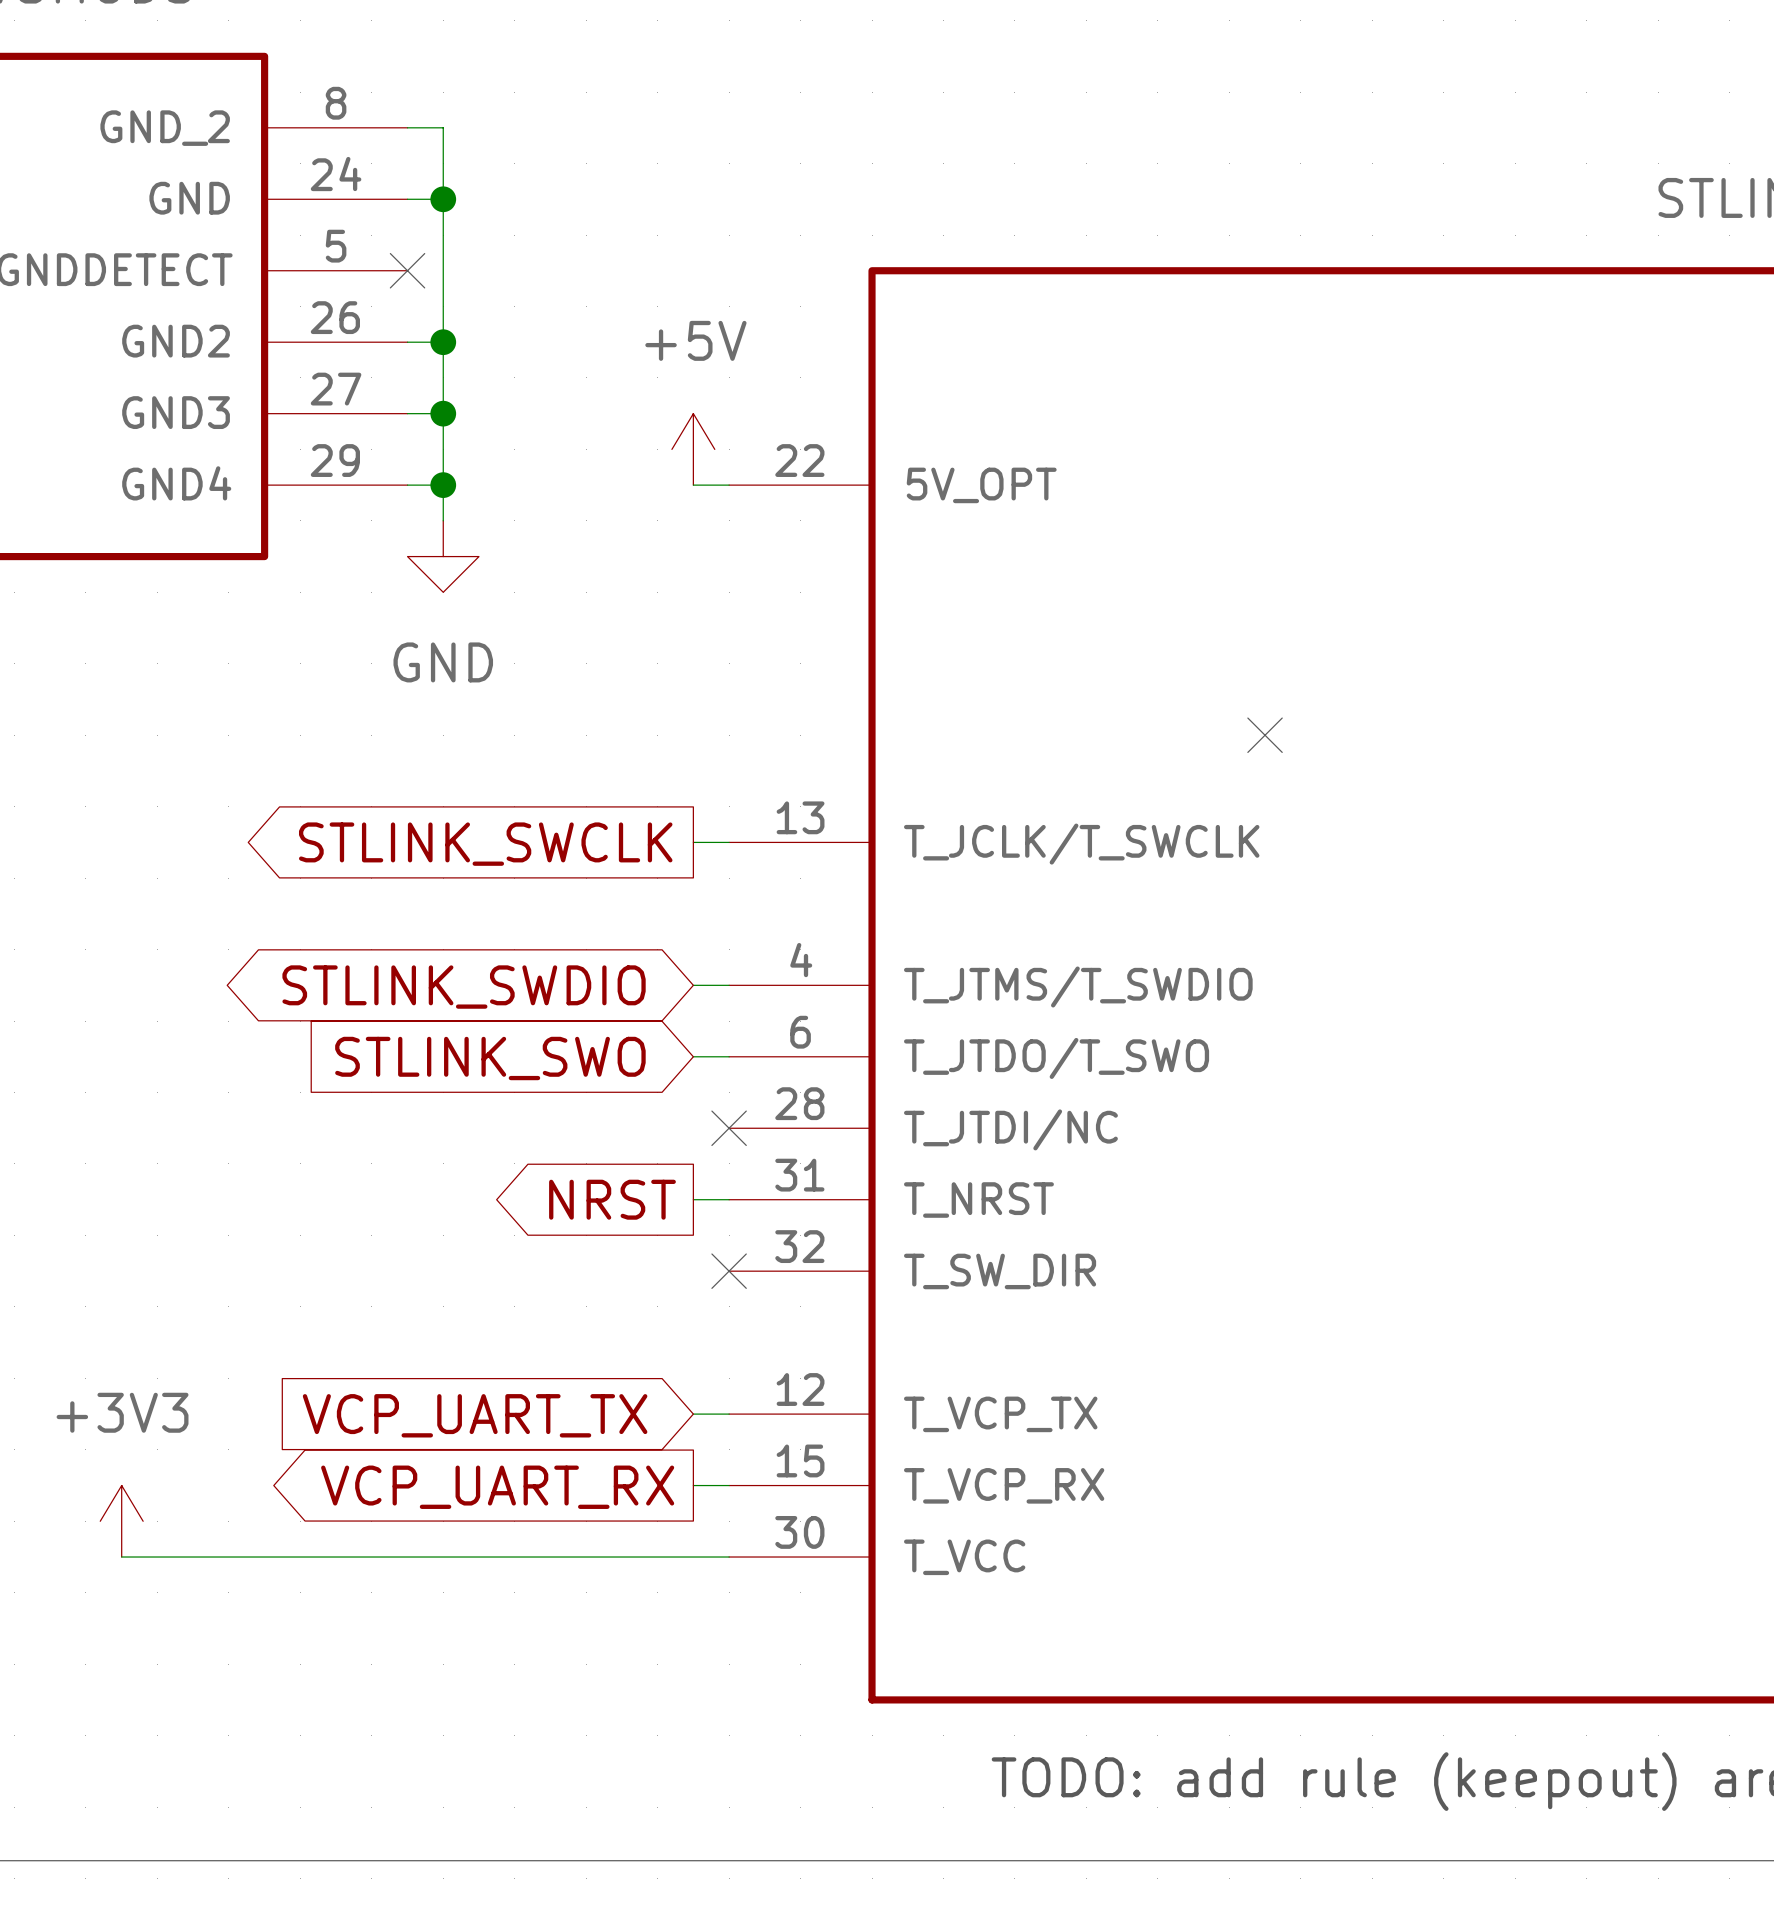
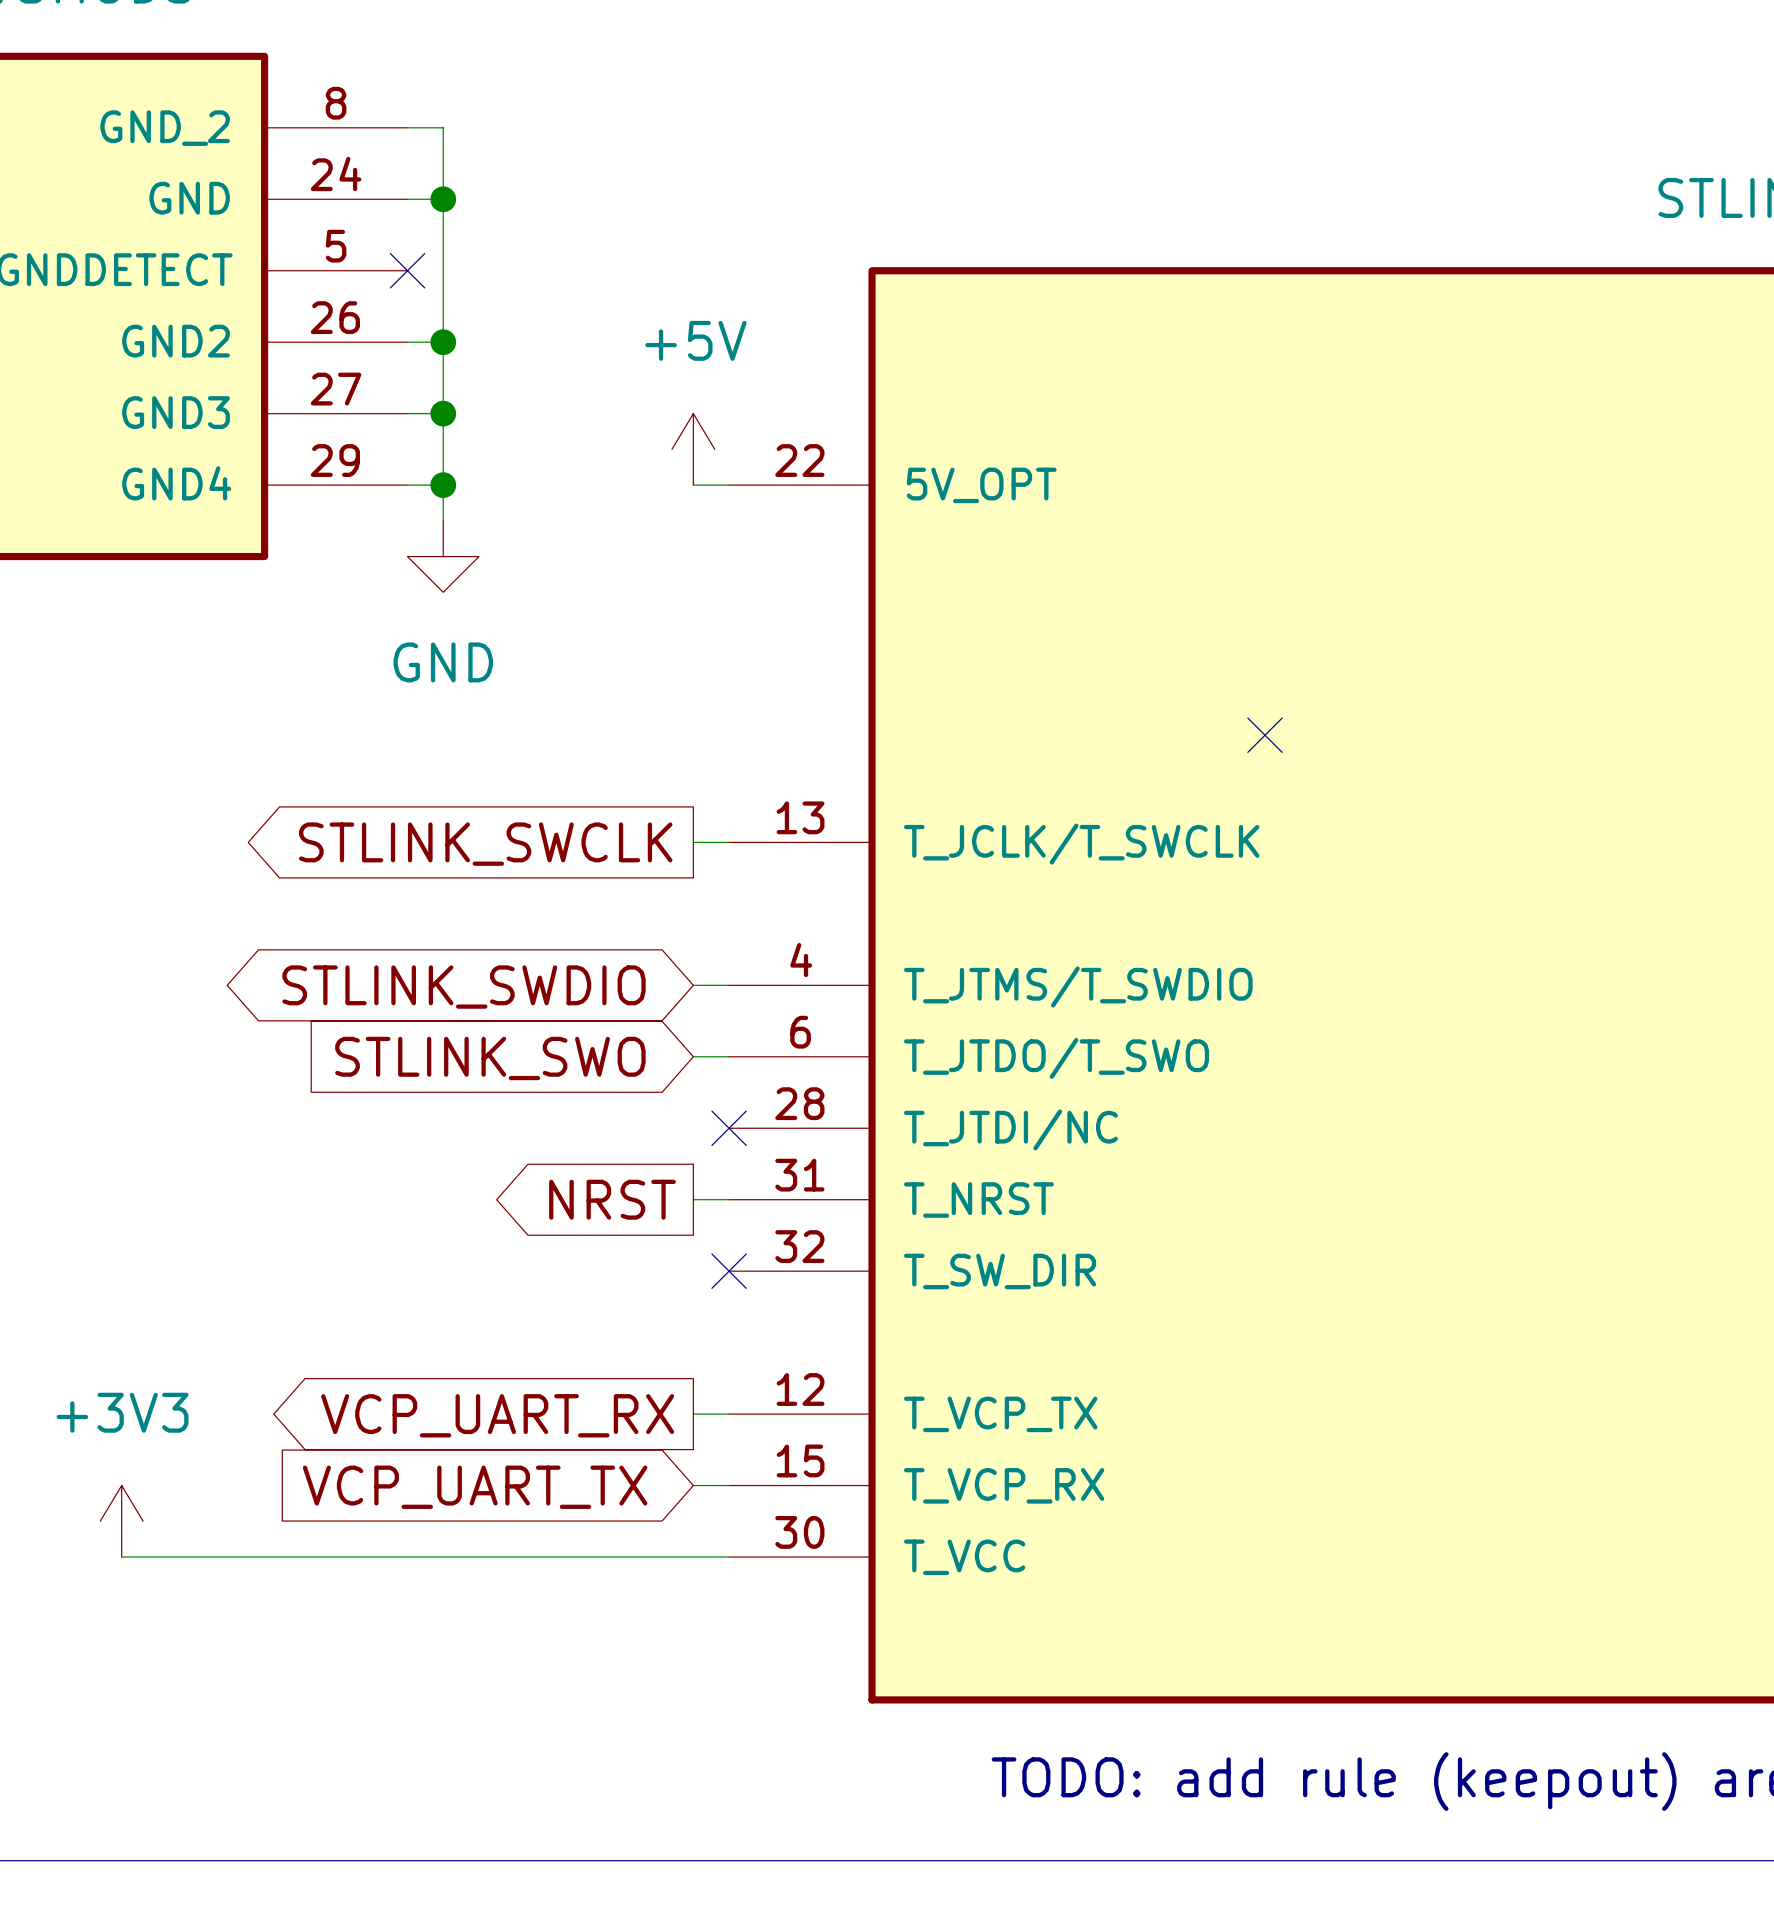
global label shape: input (475, 1415) -> output (497, 1415)
global label: VCP_UART_TX (475, 1415) -> VCP_UART_RX (497, 1415)
global label shape: output (497, 1487) -> input (475, 1487)
global label: VCP_UART_RX (497, 1487) -> VCP_UART_TX (475, 1487)

